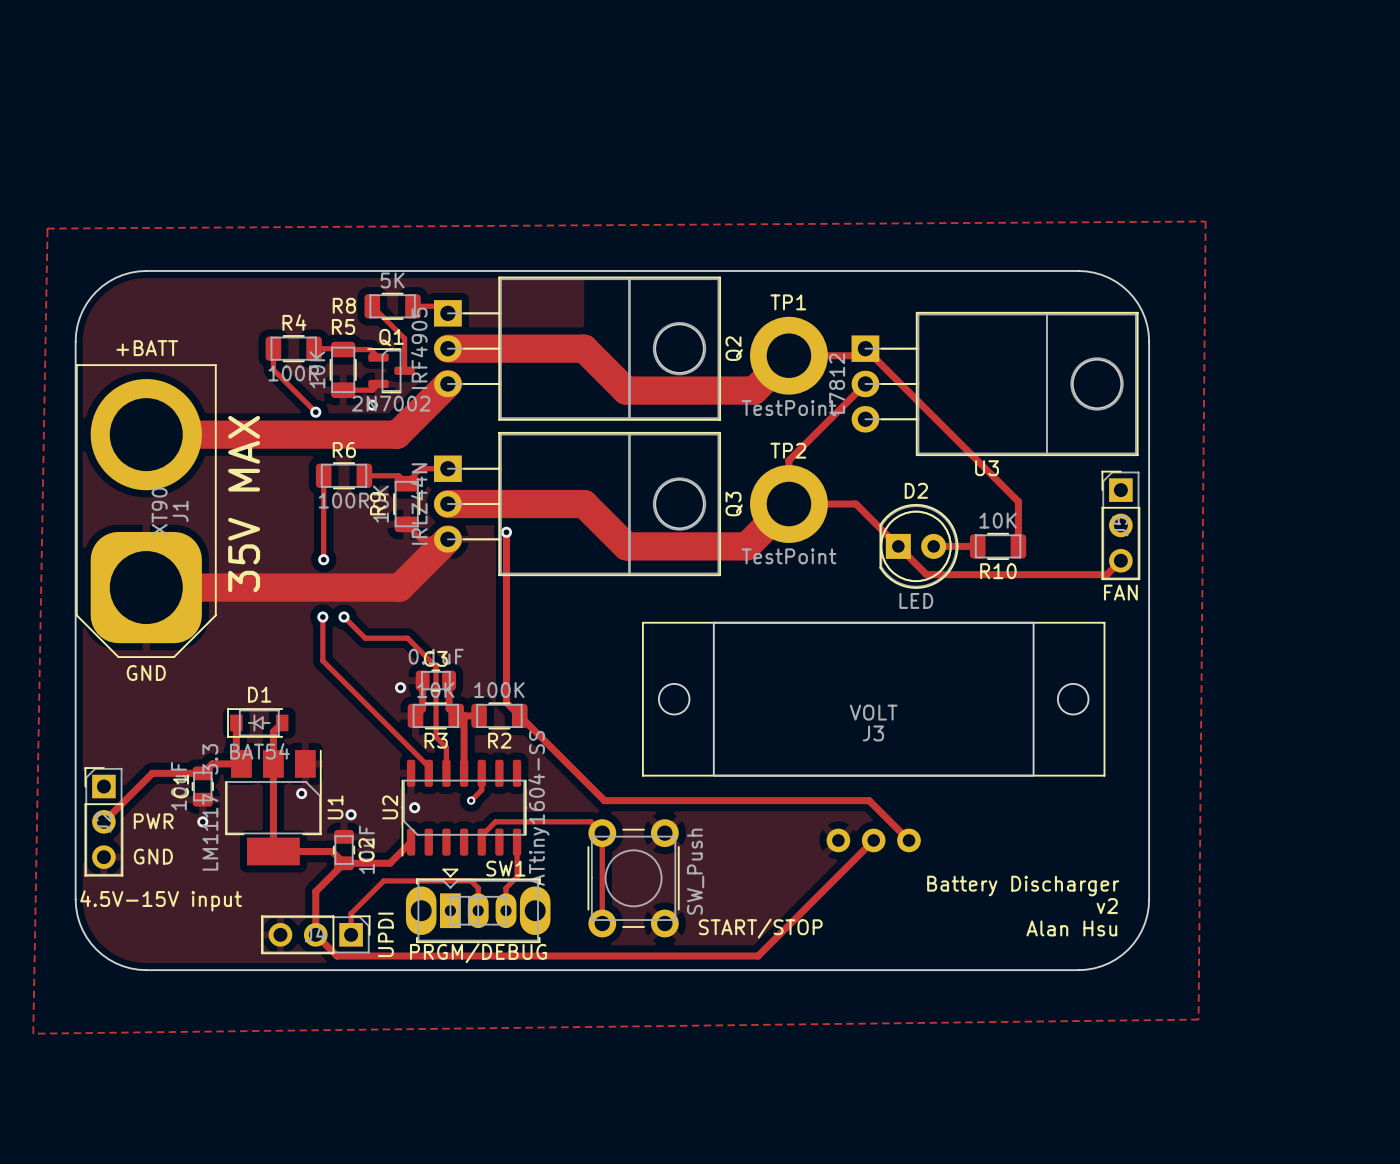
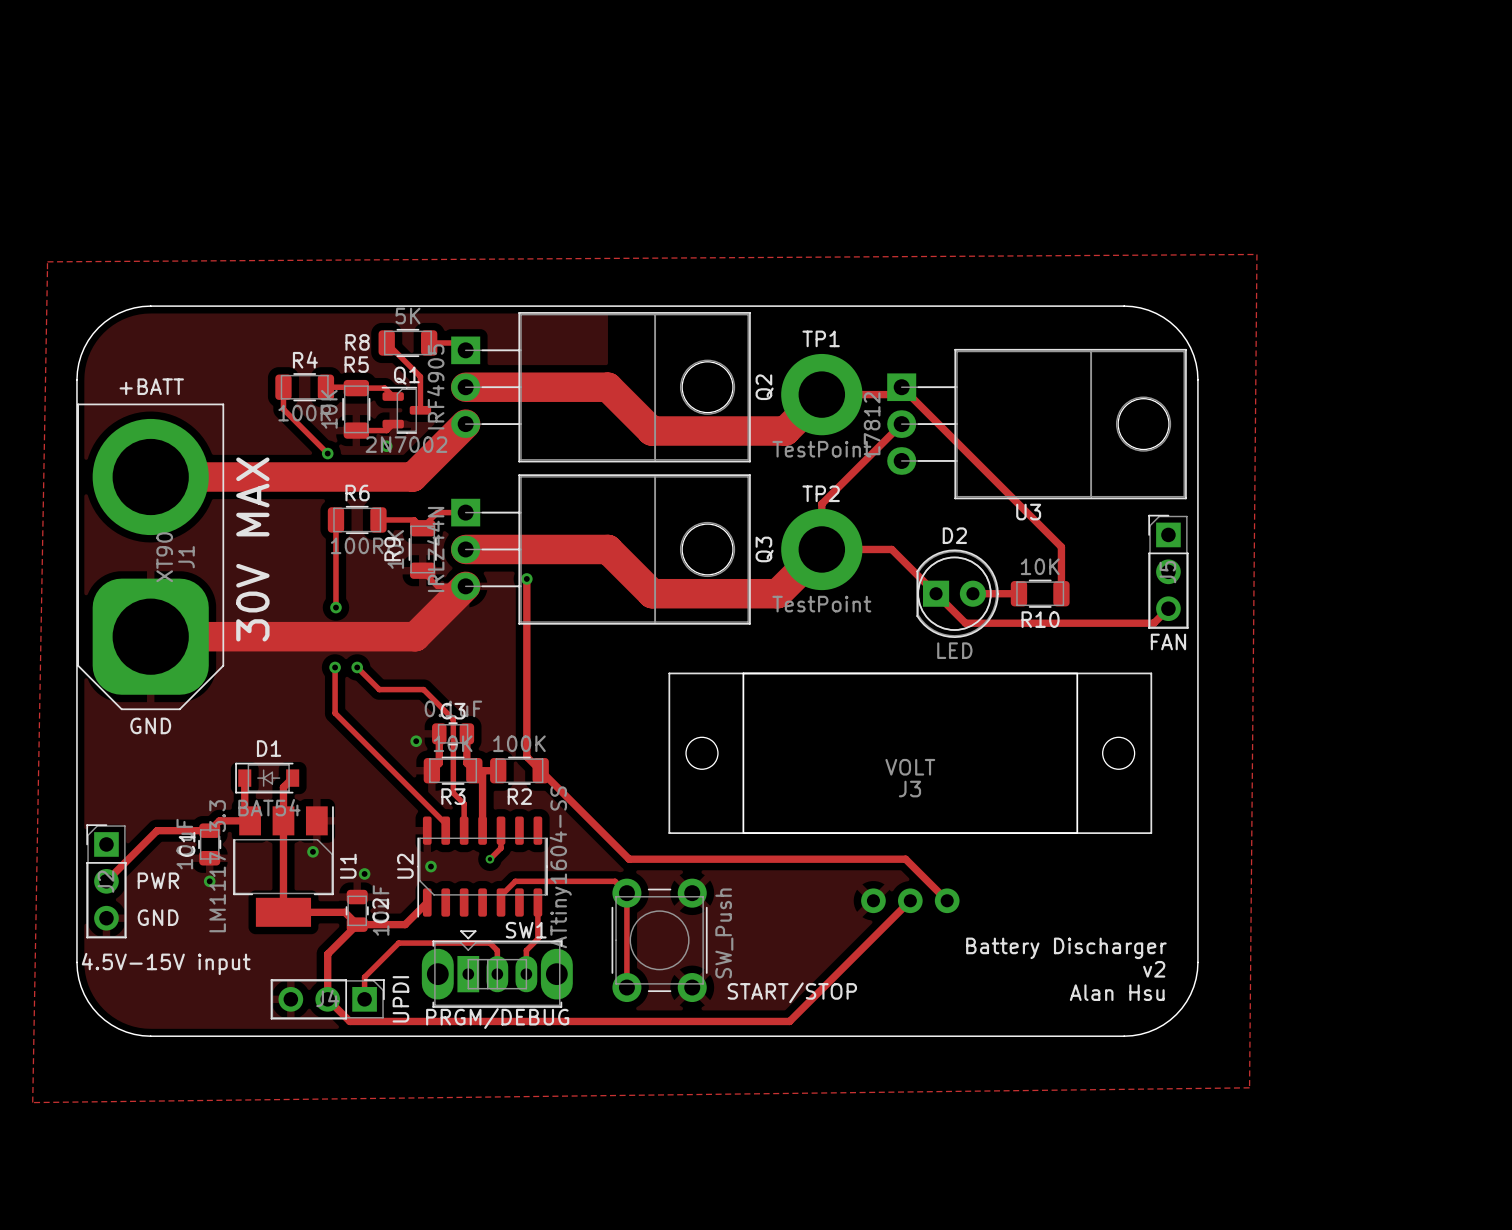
text: 35V MAX (244, 504) -> 30V MAX (252, 549)

